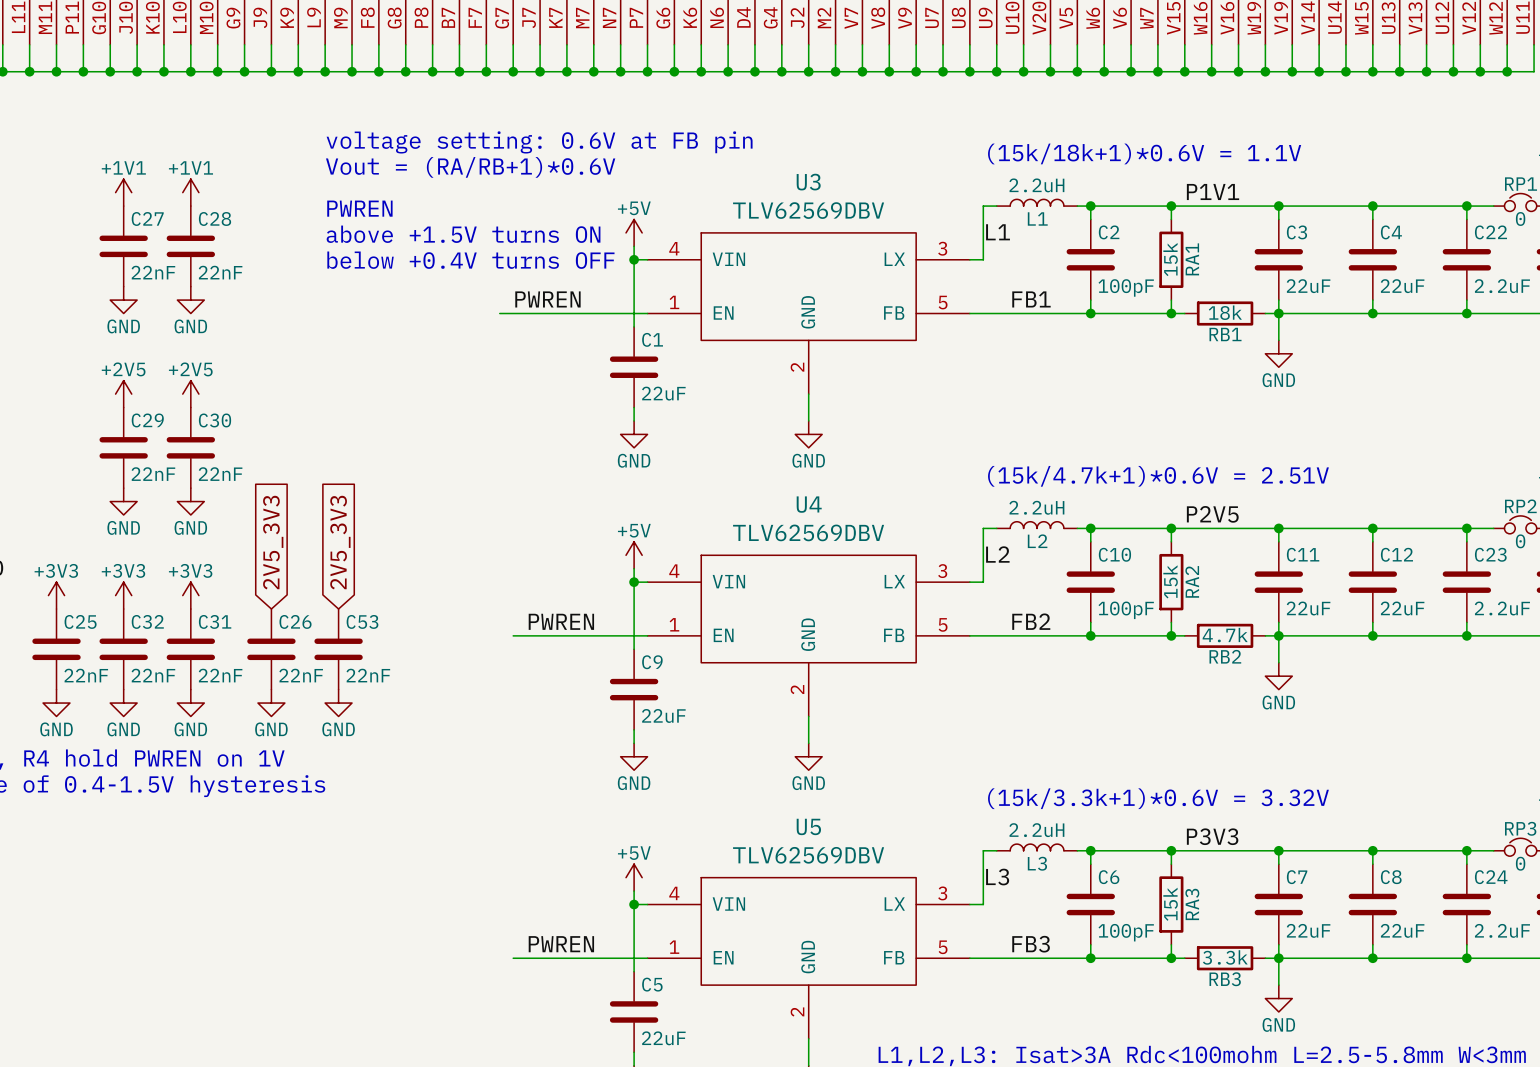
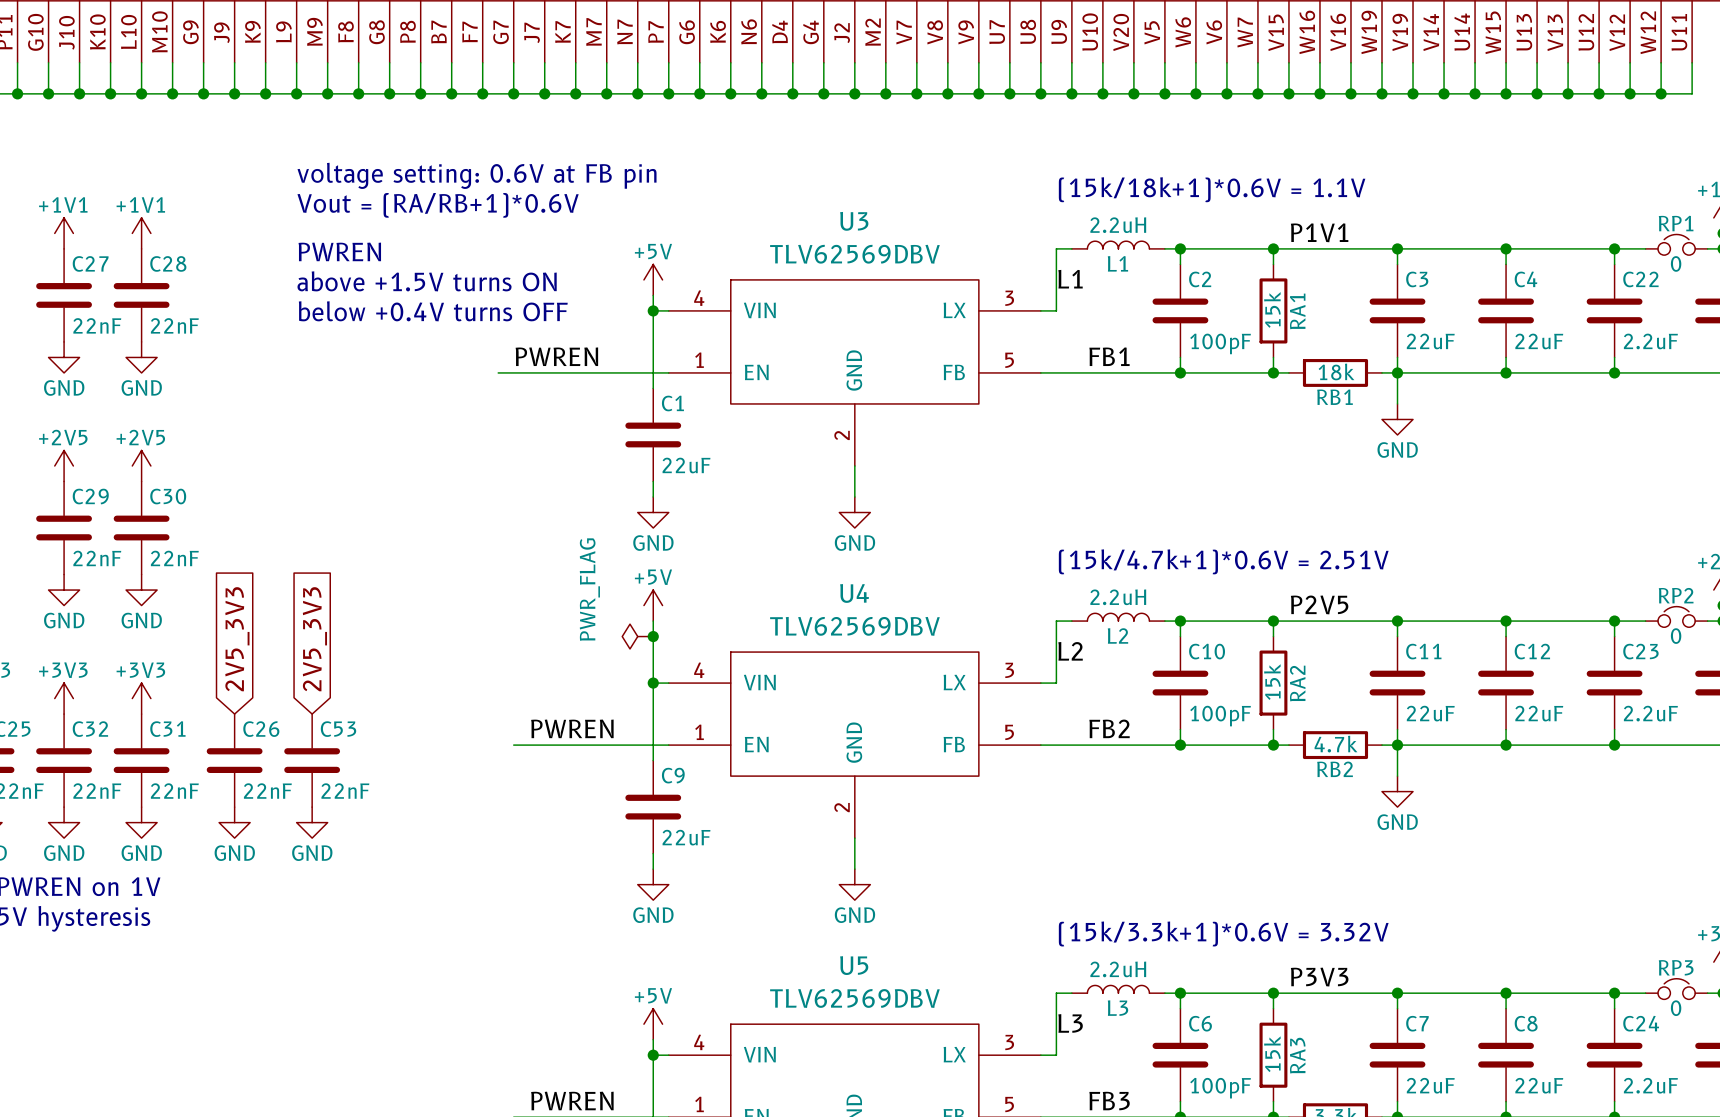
power symbol: none -> PWR_FLAG (637, 636)
junction: none -> (653, 636)
power symbol position: +5V (634, 555) -> +5V (653, 605)

